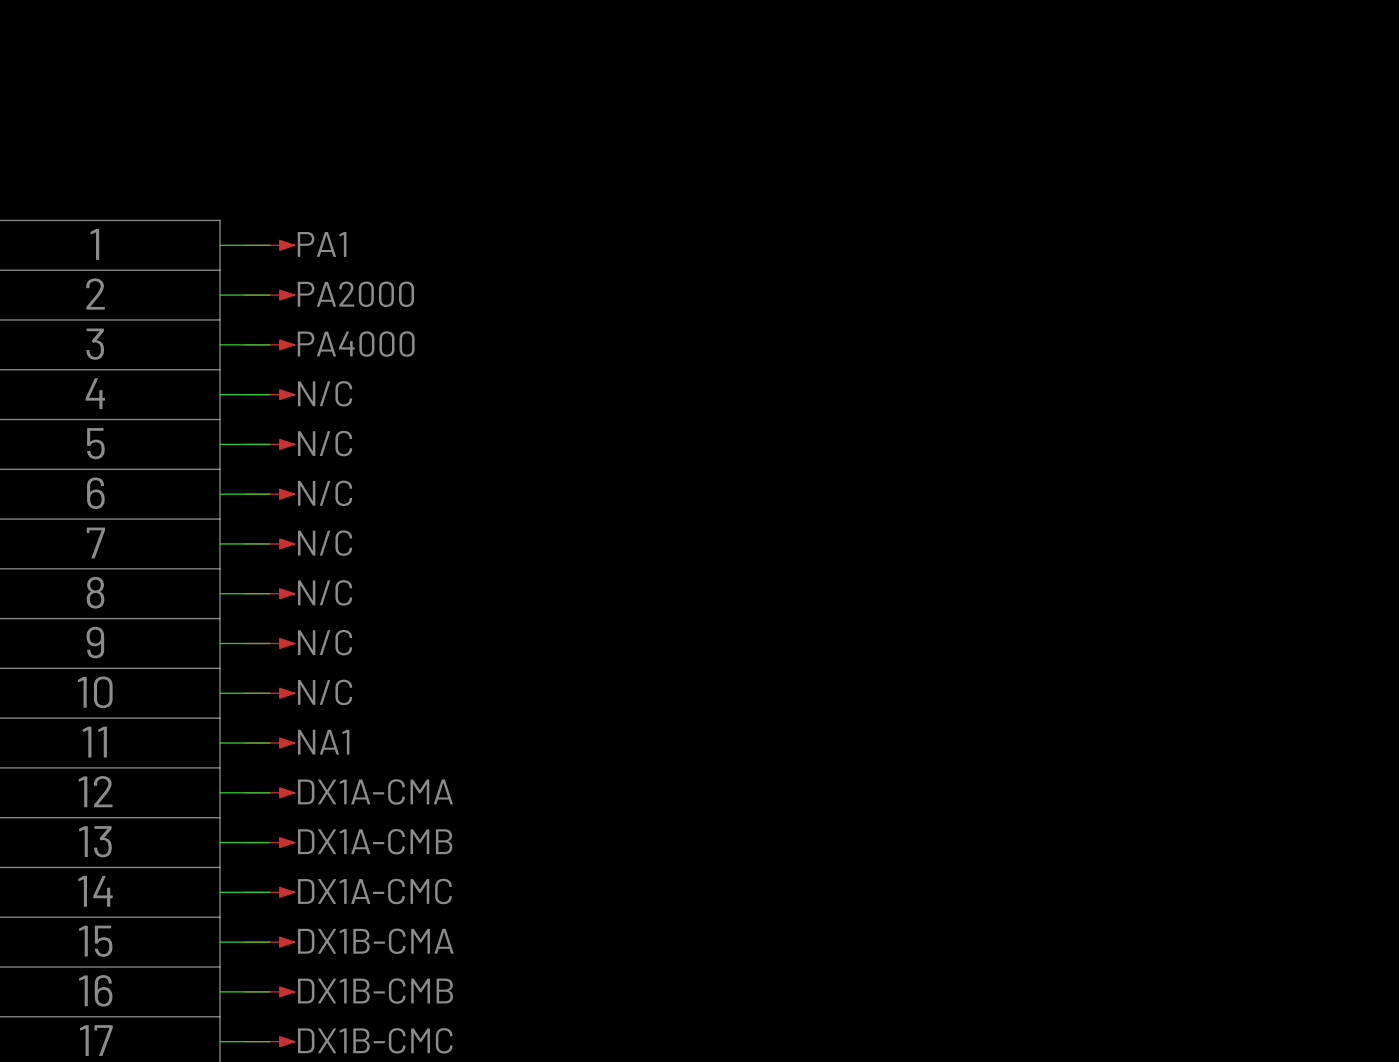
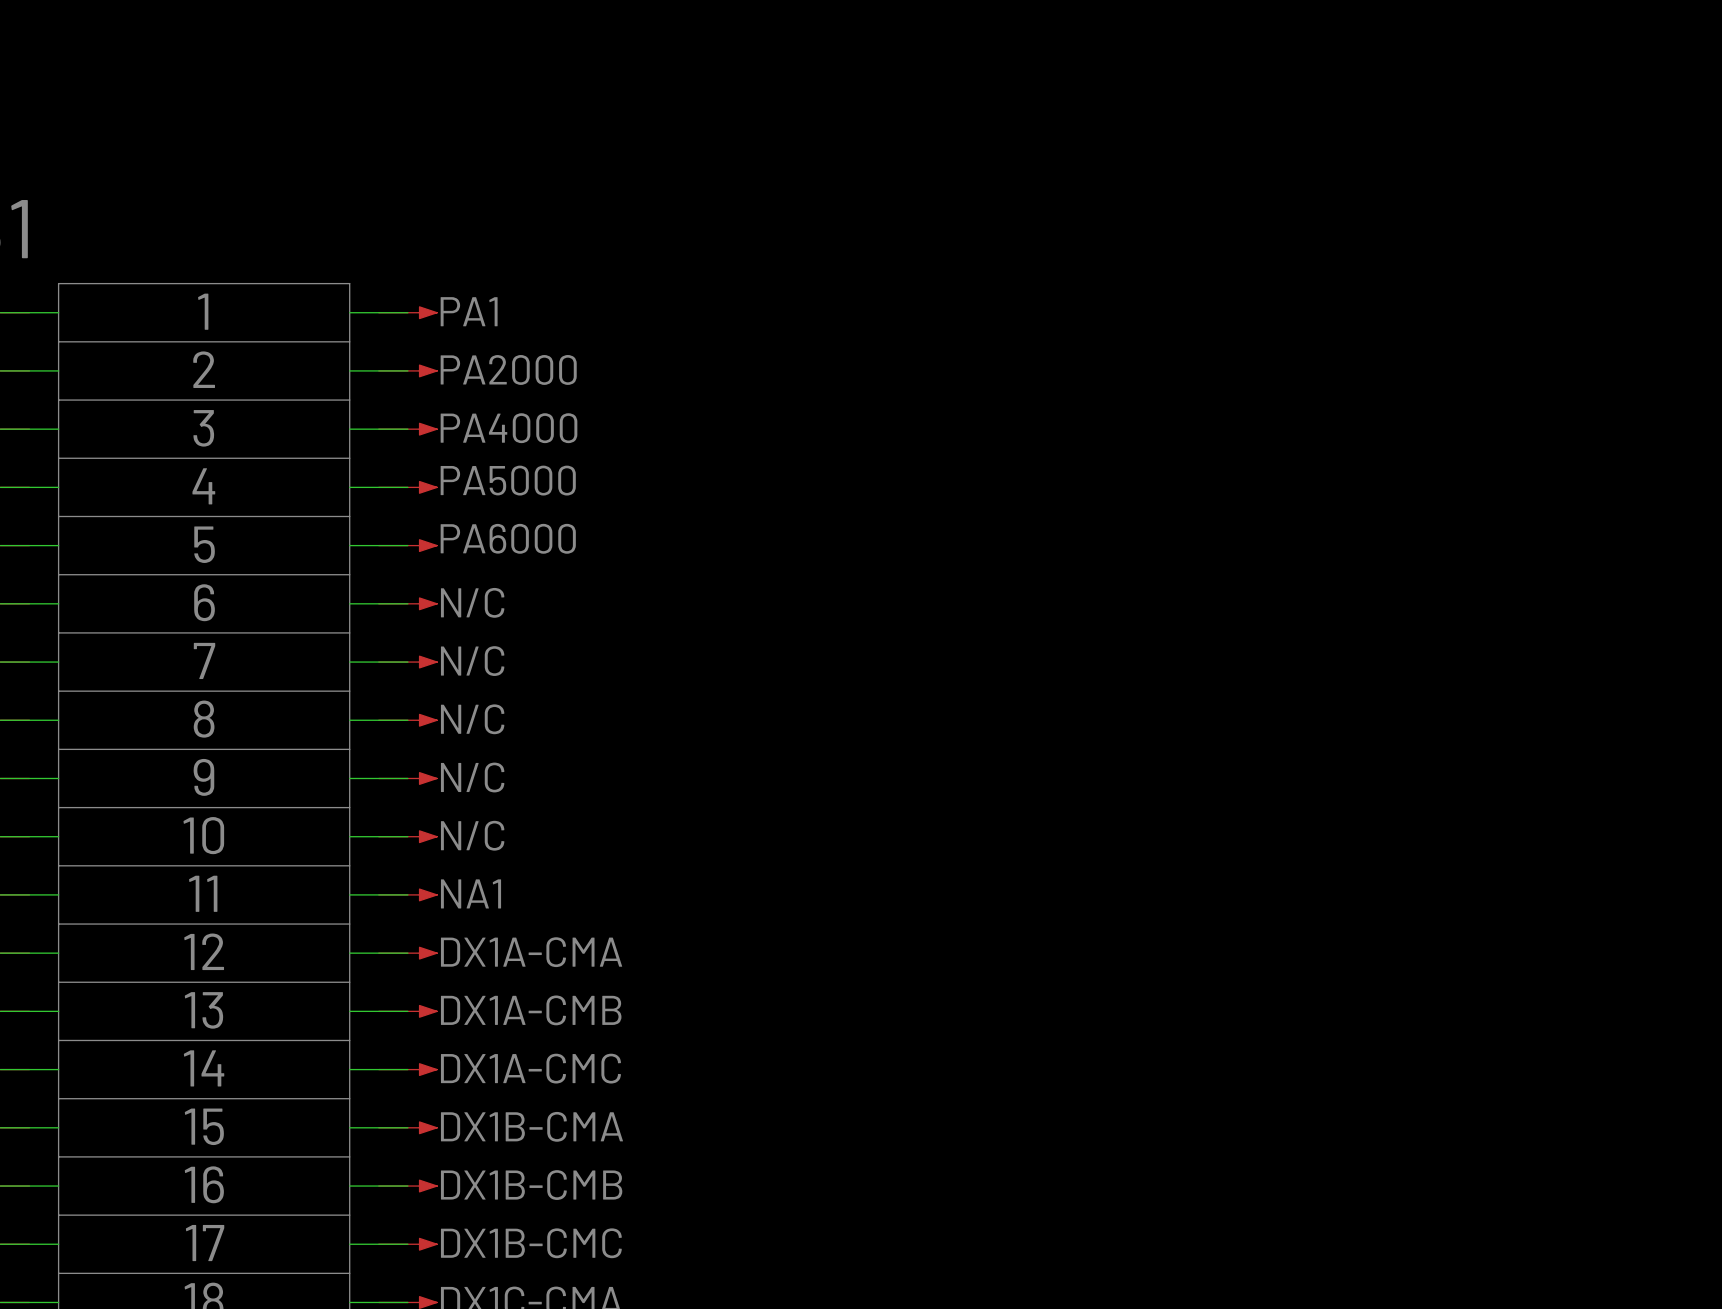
text: N/C (325, 393) -> PA5000 (508, 480)
text: N/C (325, 443) -> PA6000 (508, 538)

